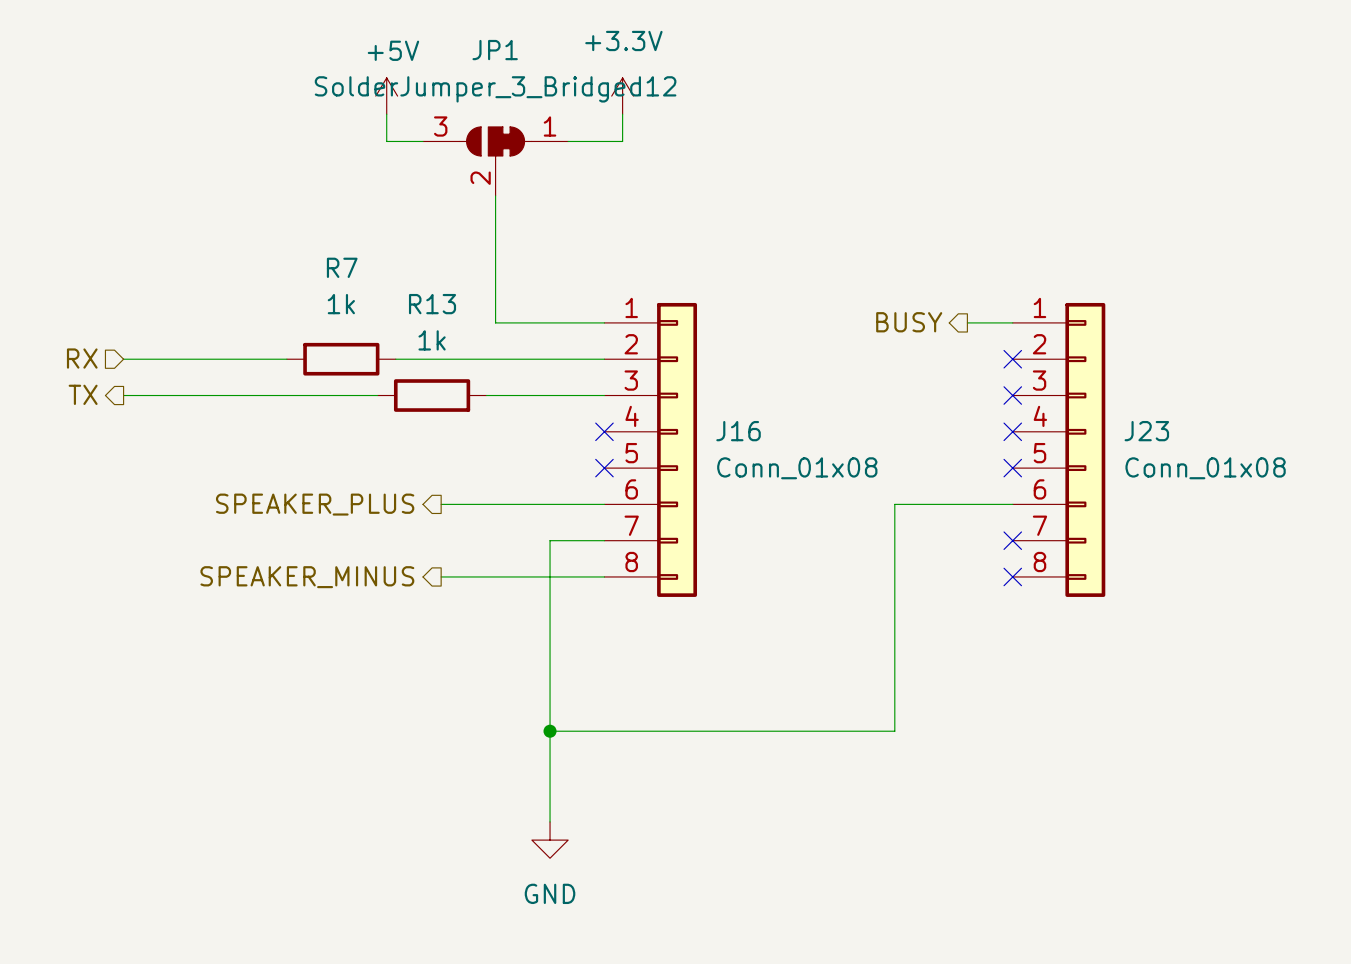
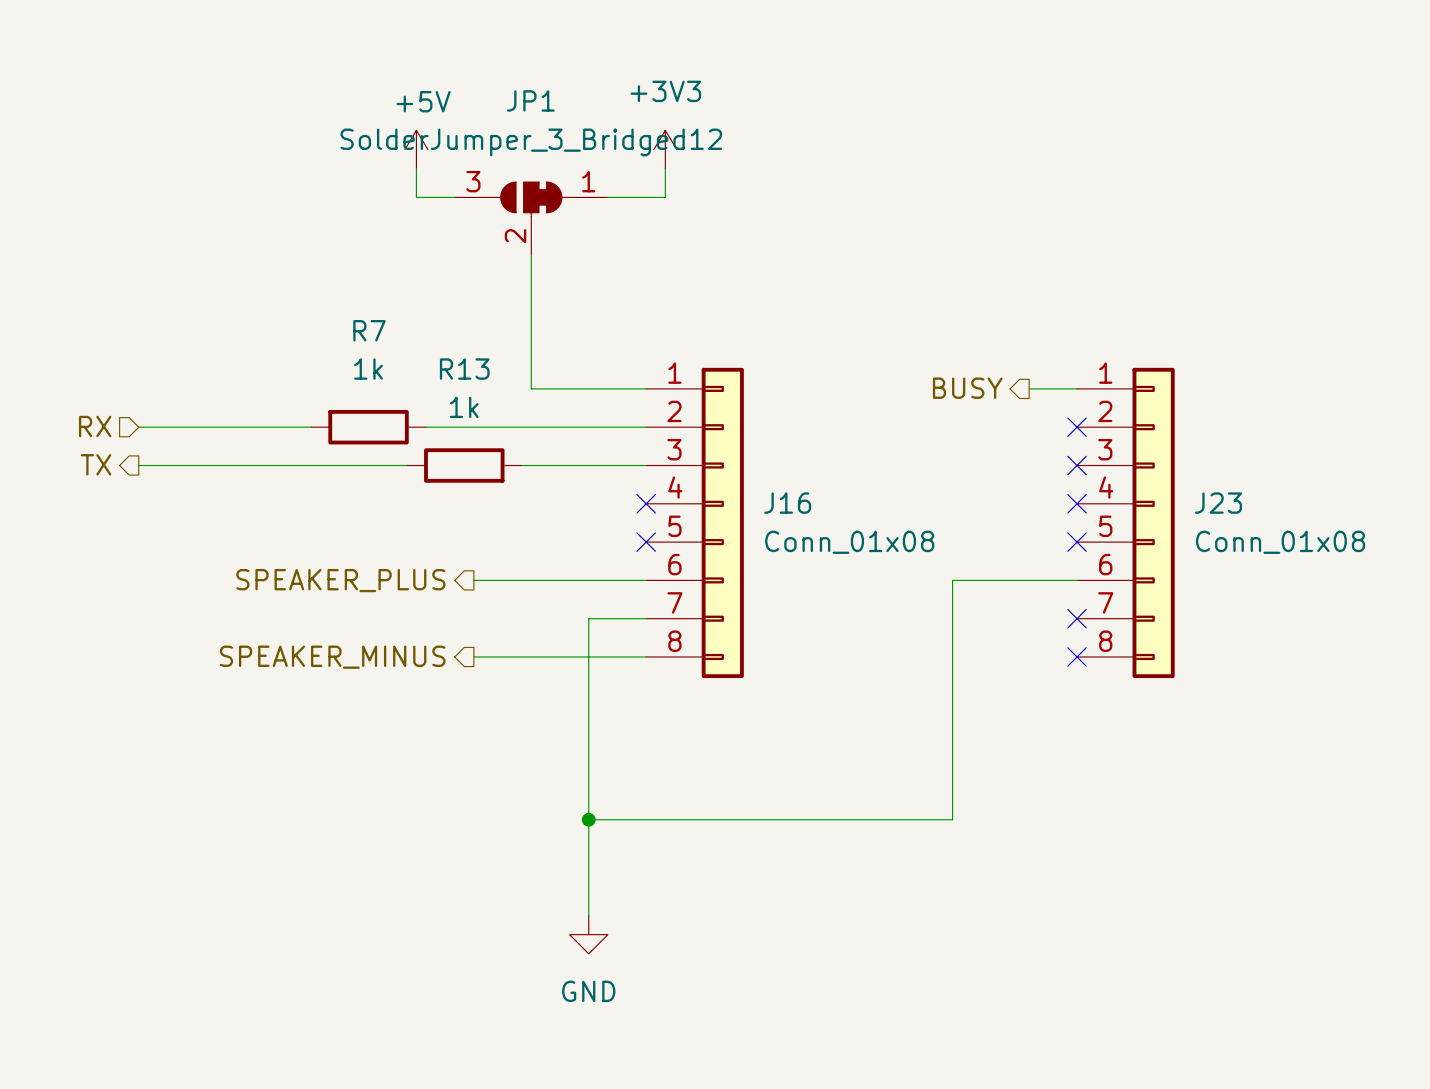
power symbol: +3.3V (622, 96) -> +3V3 (665, 149)

